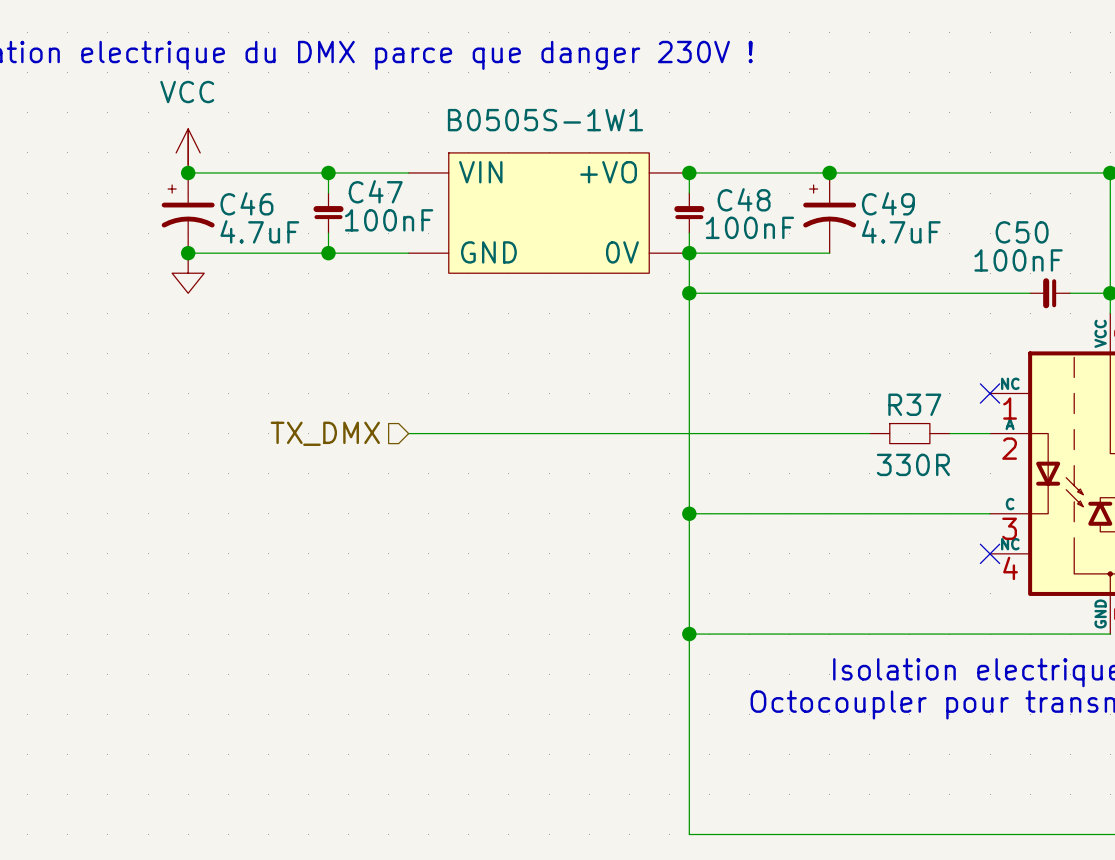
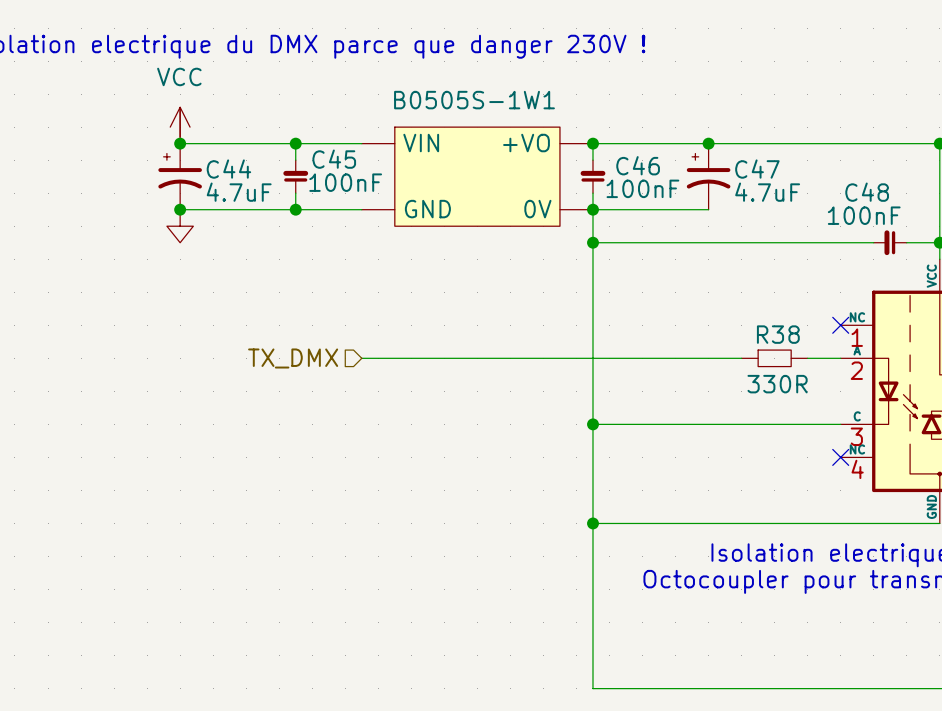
C47 name: C47 (375, 191) -> C45 (334, 159)
C48 name: C48 (744, 199) -> C46 (638, 165)
C46 name: C46 (246, 203) -> C44 (228, 169)
C49 name: C49 (888, 203) -> C47 (757, 169)
C50 name: C50 (1022, 232) -> C48 (867, 192)
R37 name: R37 (914, 404) -> R38 (778, 334)

